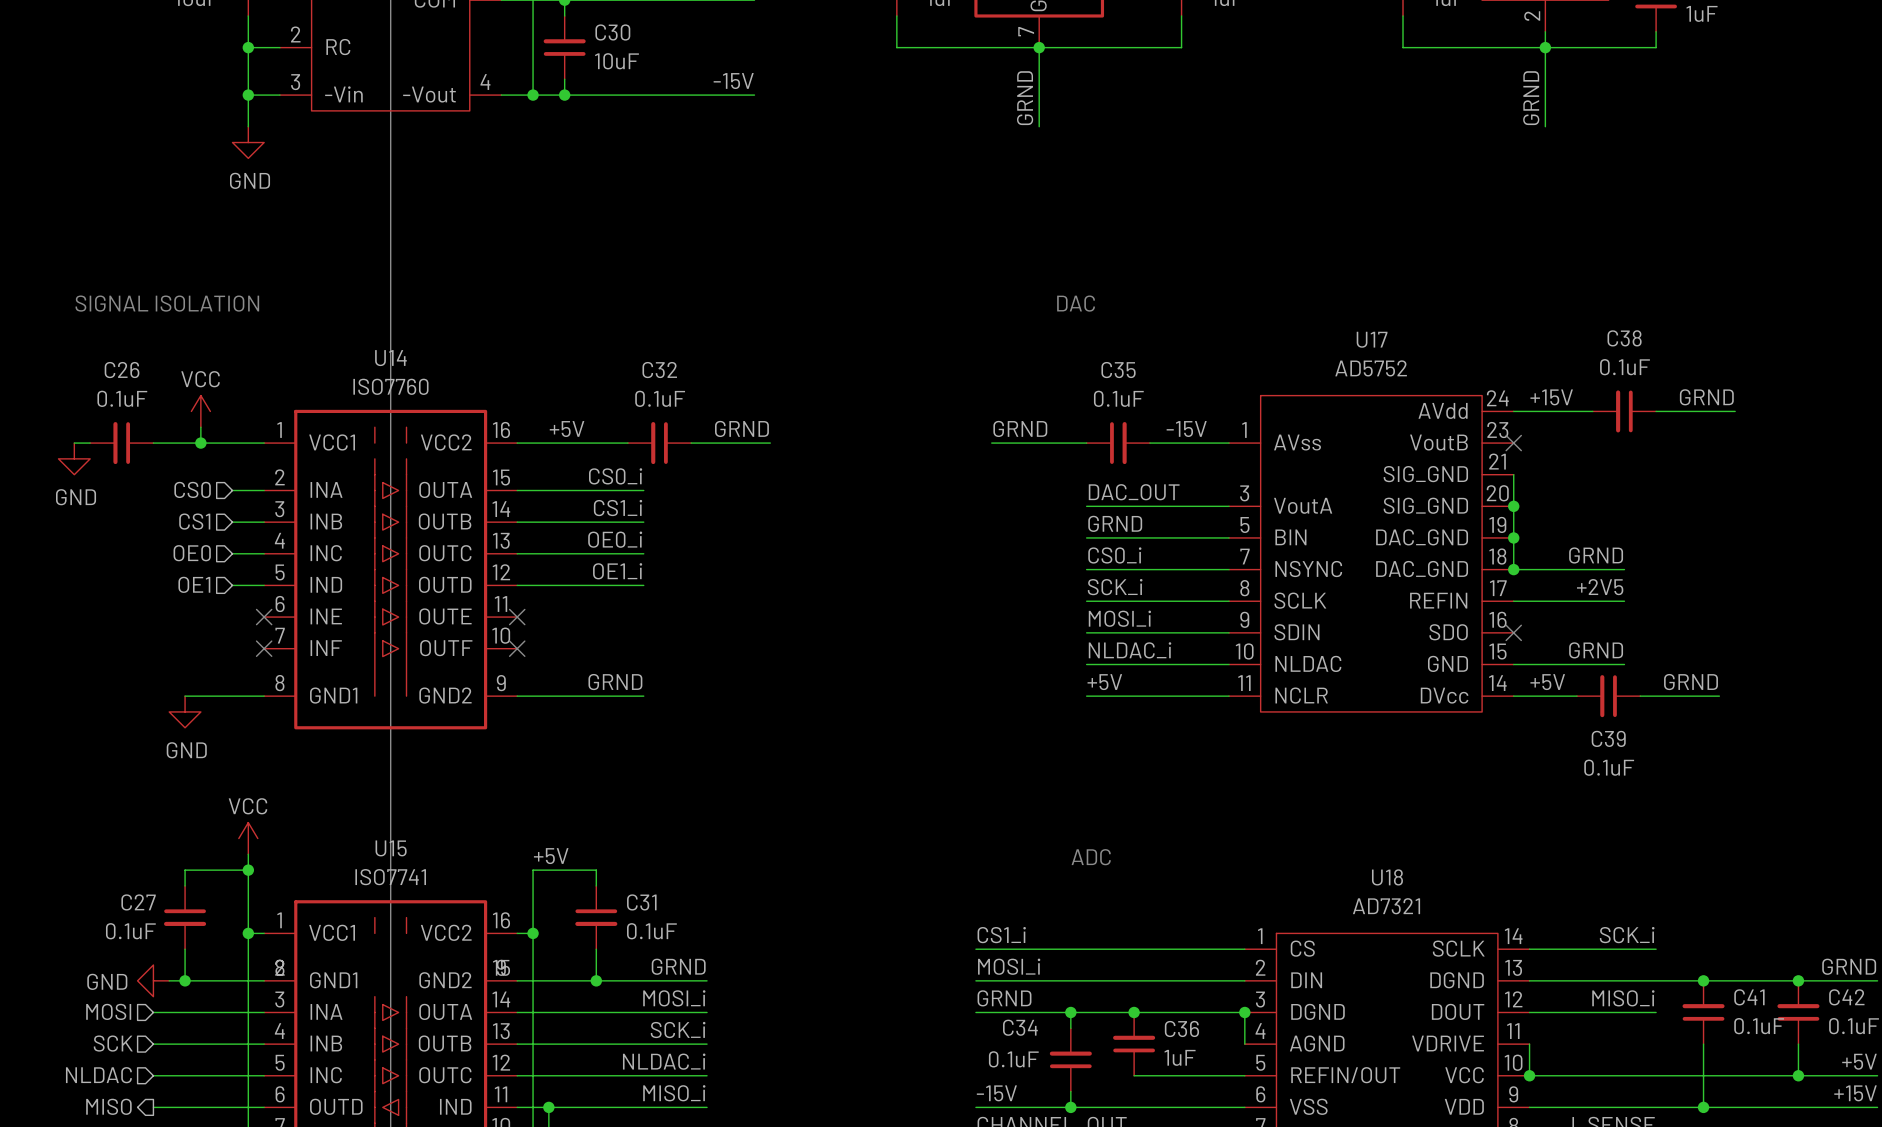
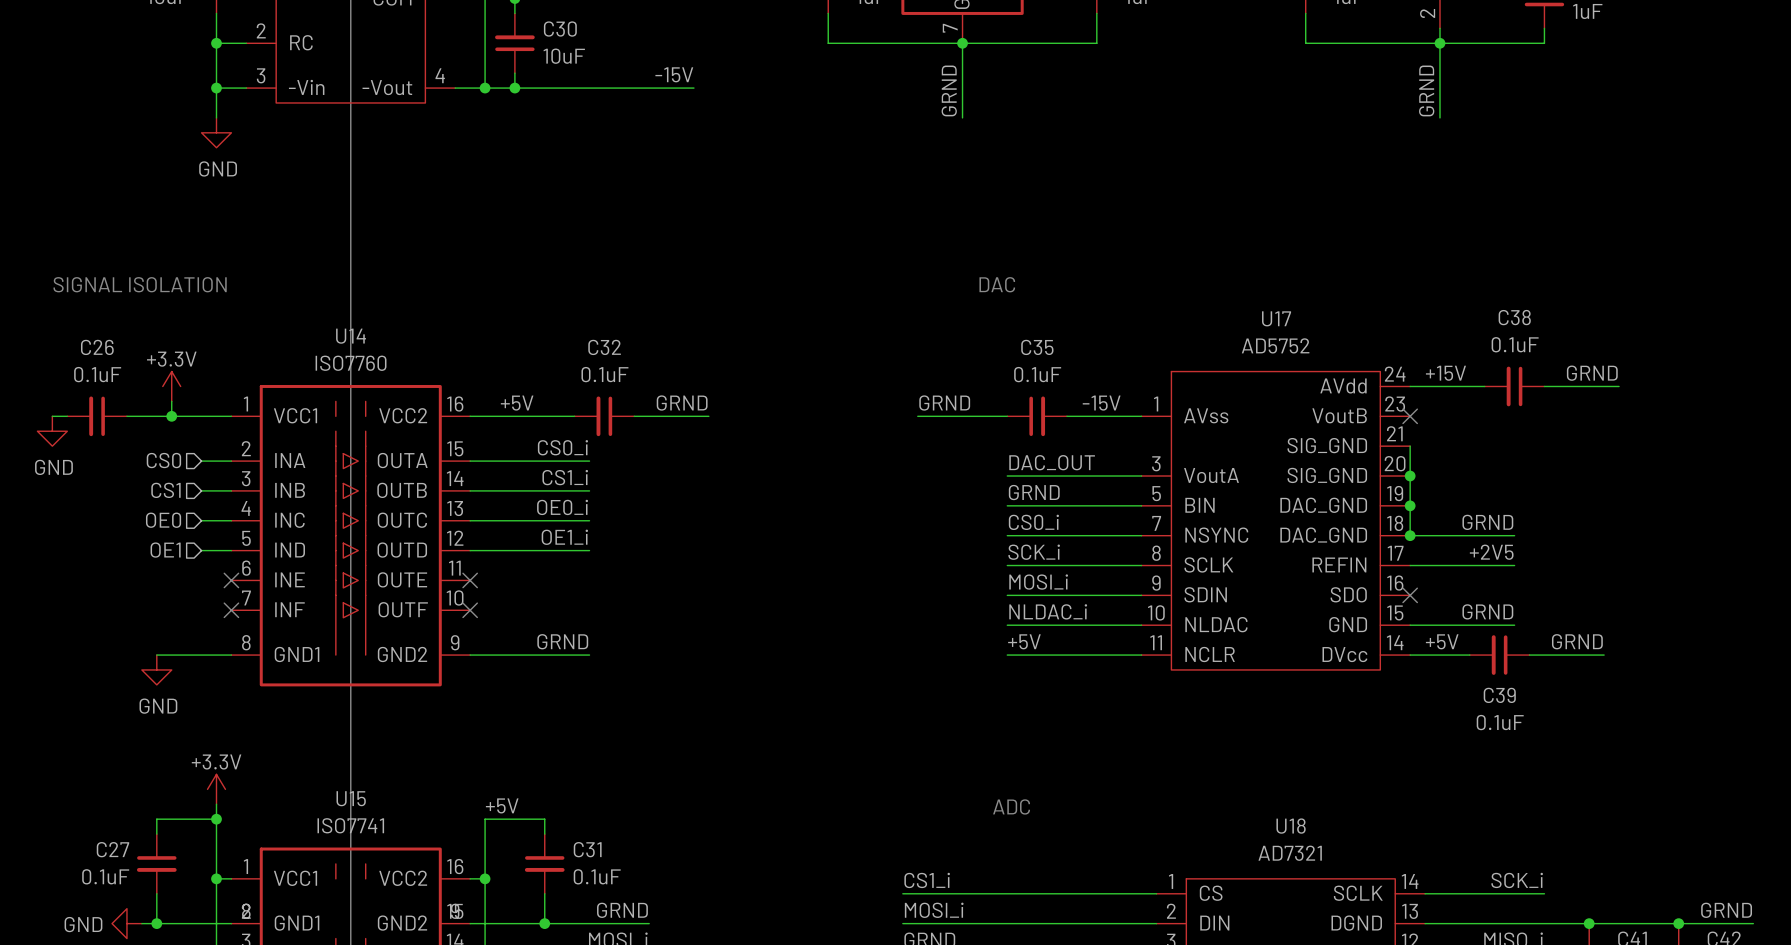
power symbol: VCC (200, 411) -> +3.3V (171, 386)
power symbol: VCC (248, 838) -> +3.3V (216, 789)

